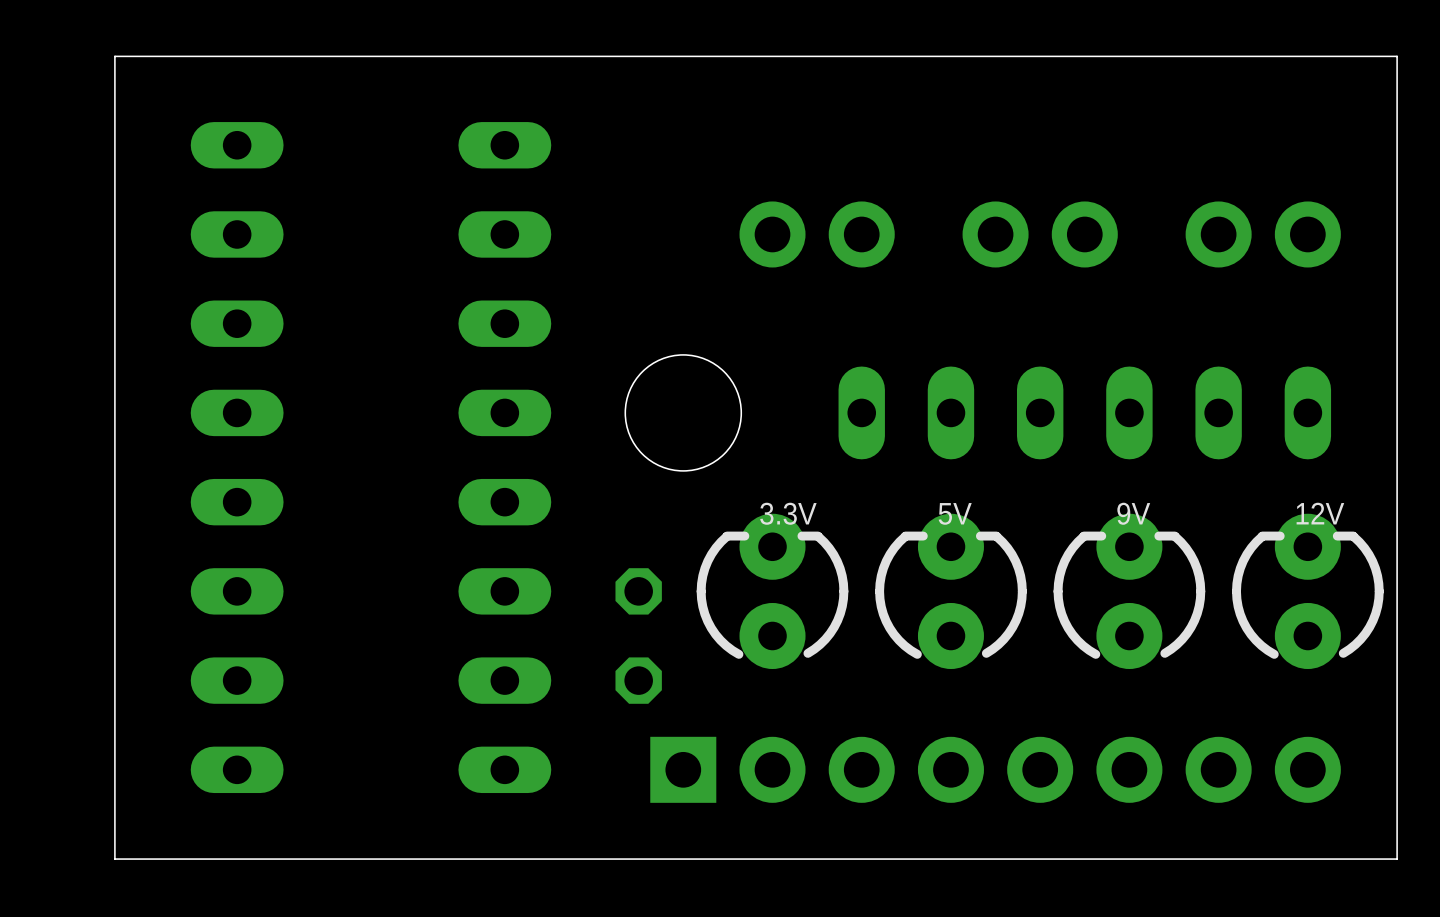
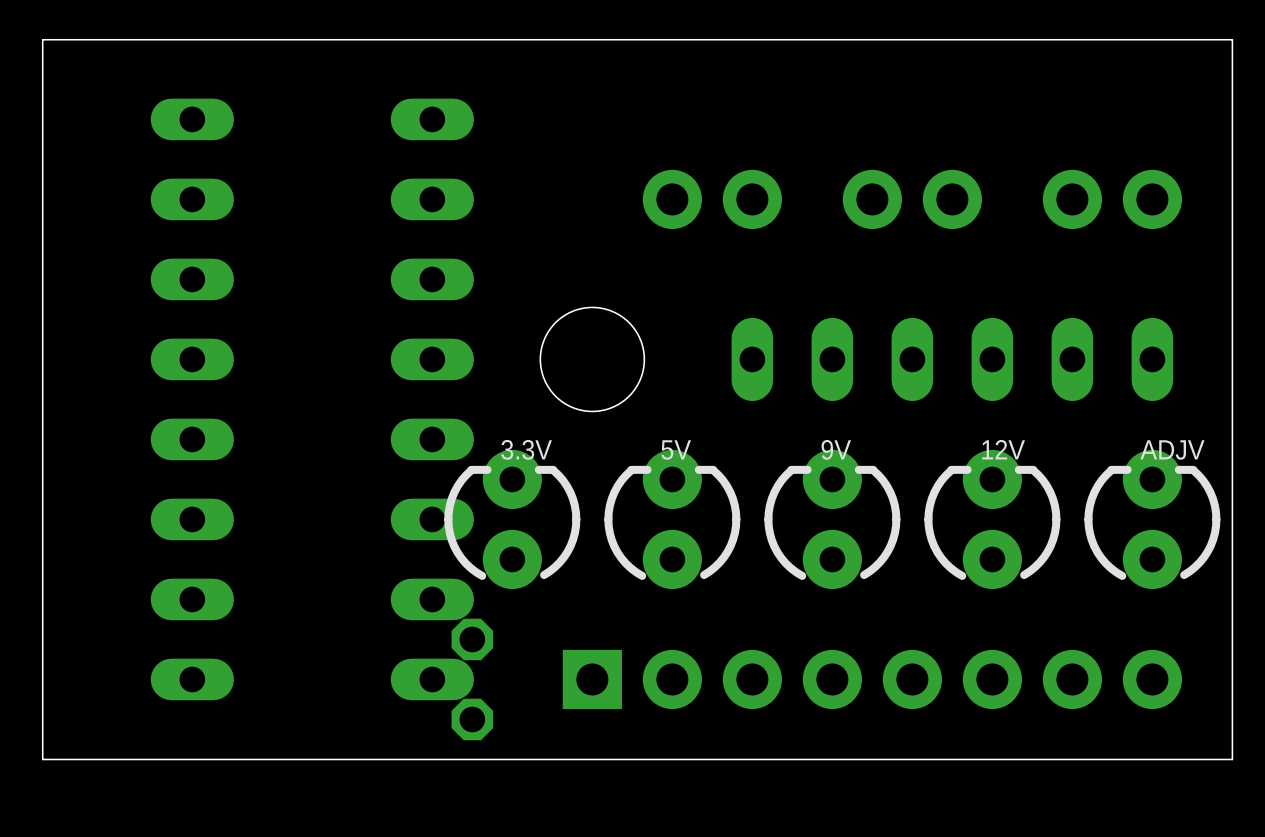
board edge: (114, 56) (114, 859) -> (82, 39) (42, 39) (42, 759) (82, 759)
3.3V name: 3.3V (788, 513) -> 5V (676, 449)
5V name: 5V (955, 513) -> 9V (836, 449)
9V name: 9V (1133, 513) -> 12V (1003, 449)
12V name: 12V (1320, 513) -> ADJV (1172, 449)
3.3V: none -> (512, 519)
part position: (638, 635) -> (472, 679)

